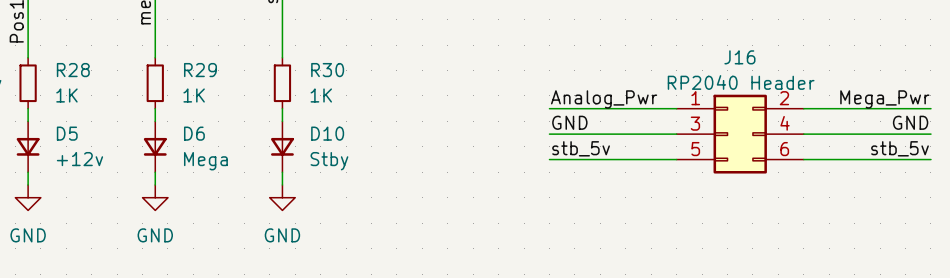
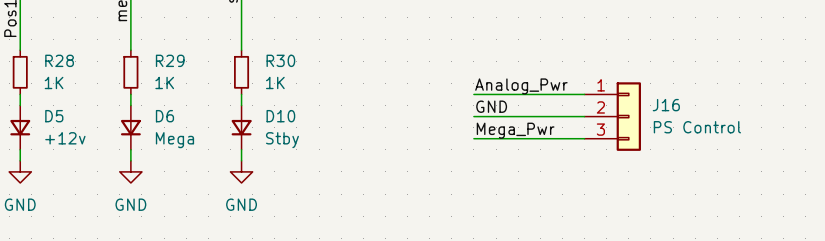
J16 name position: J16 (739, 57) -> J16 (666, 105)
J16 value: RP2040 Header (741, 82) -> PS Control (697, 127)
J16 symbol: [676, 94, 804, 174] -> [584, 82, 641, 151]
label: Mega_Pwr (884, 99) -> none
wire: (803, 108) (930, 108) -> none
label: GND (910, 122) -> none
wire: (803, 134) (930, 134) -> none
label: stb_5v (581, 148) -> Mega_Pwr (515, 130)
label: stb_5v (900, 148) -> none
wire: (803, 159) (930, 159) -> none

